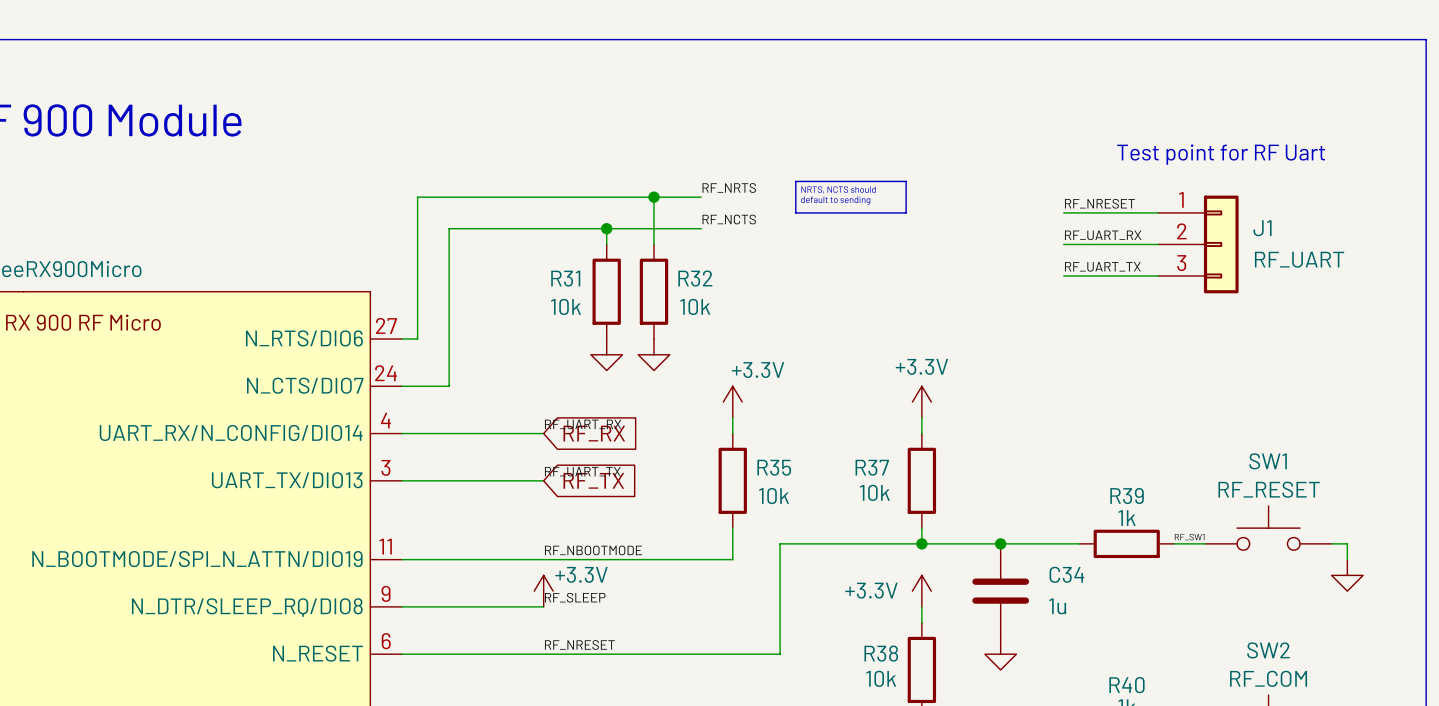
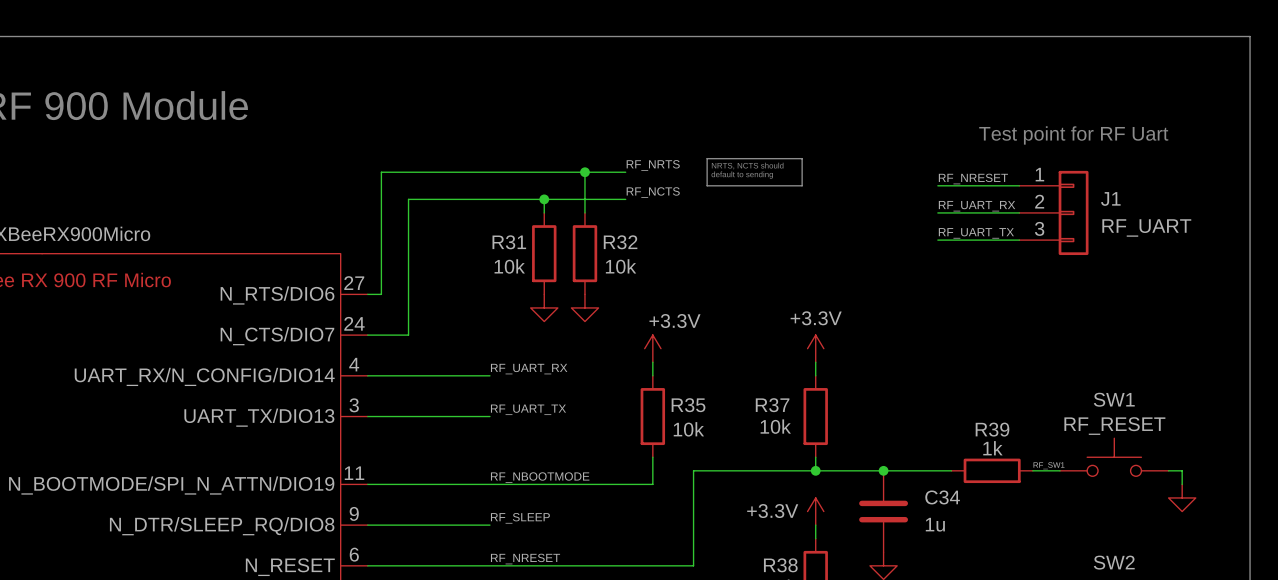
global label: RF_RX (594, 433) -> none
global label: RF_TX (593, 480) -> none
power symbol: +3.3V (543, 591) -> none

